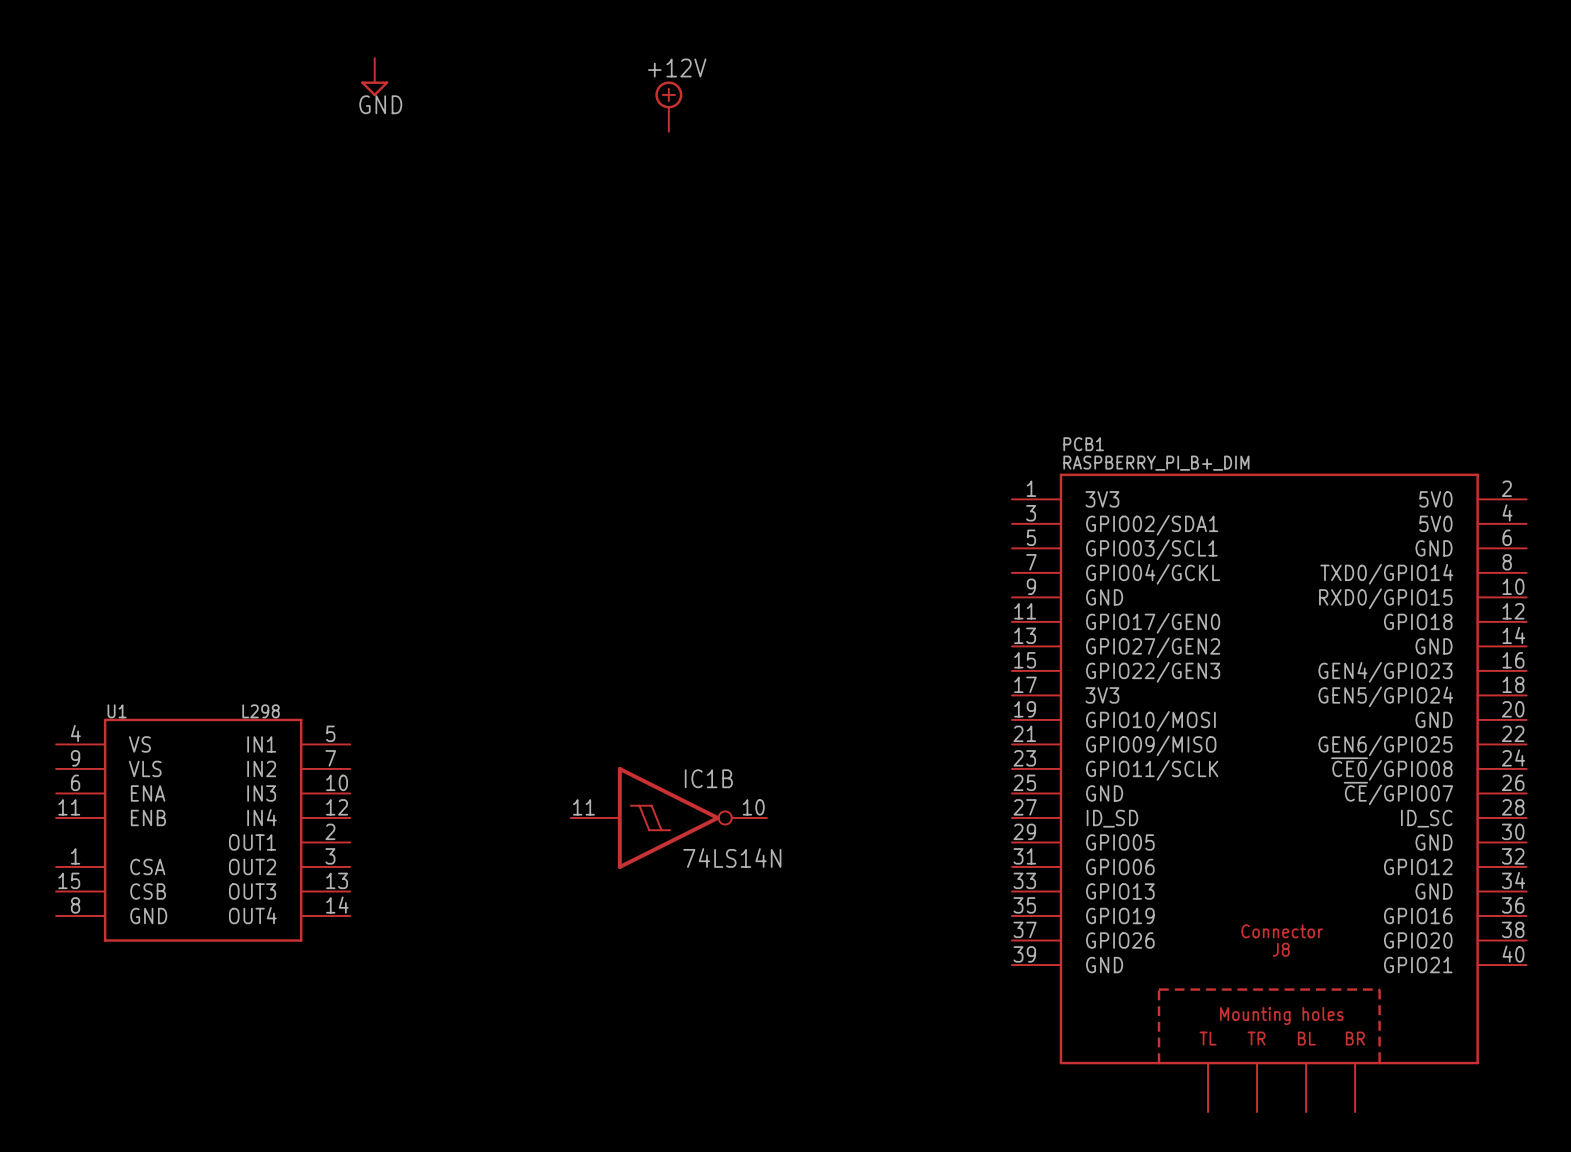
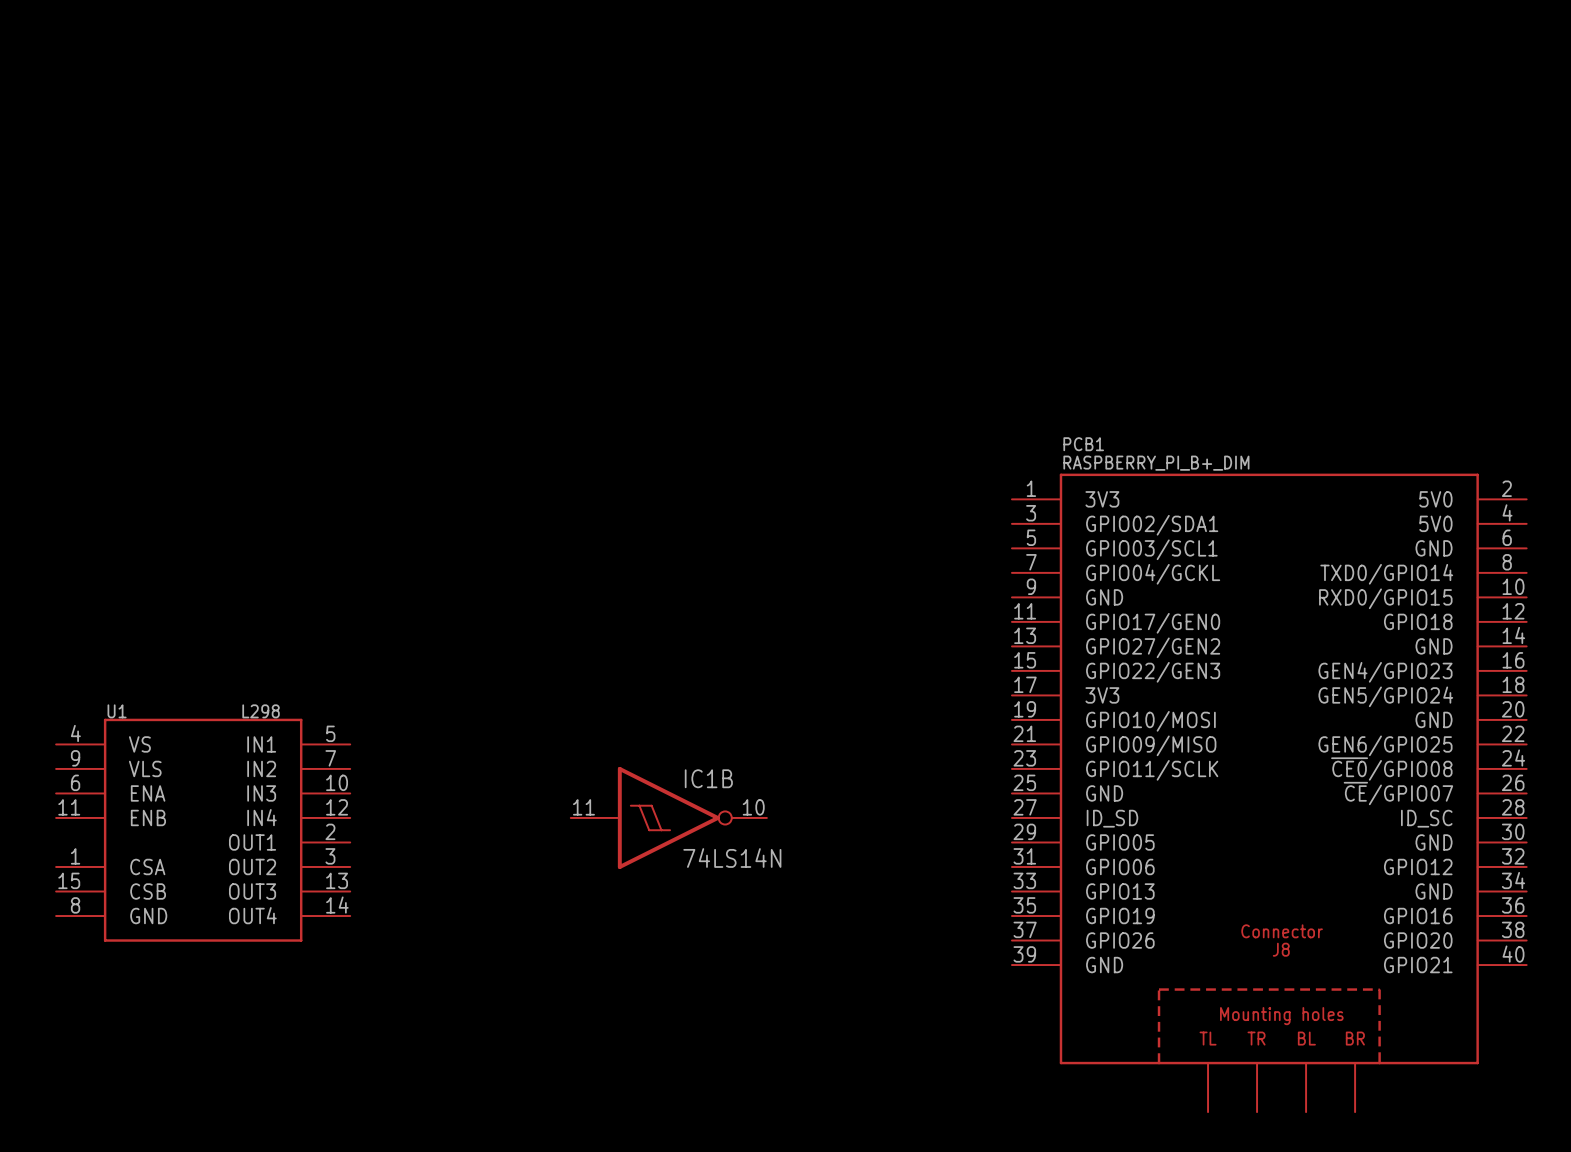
power symbol: GND (374, 77) -> none
power symbol: +12V (668, 106) -> none

